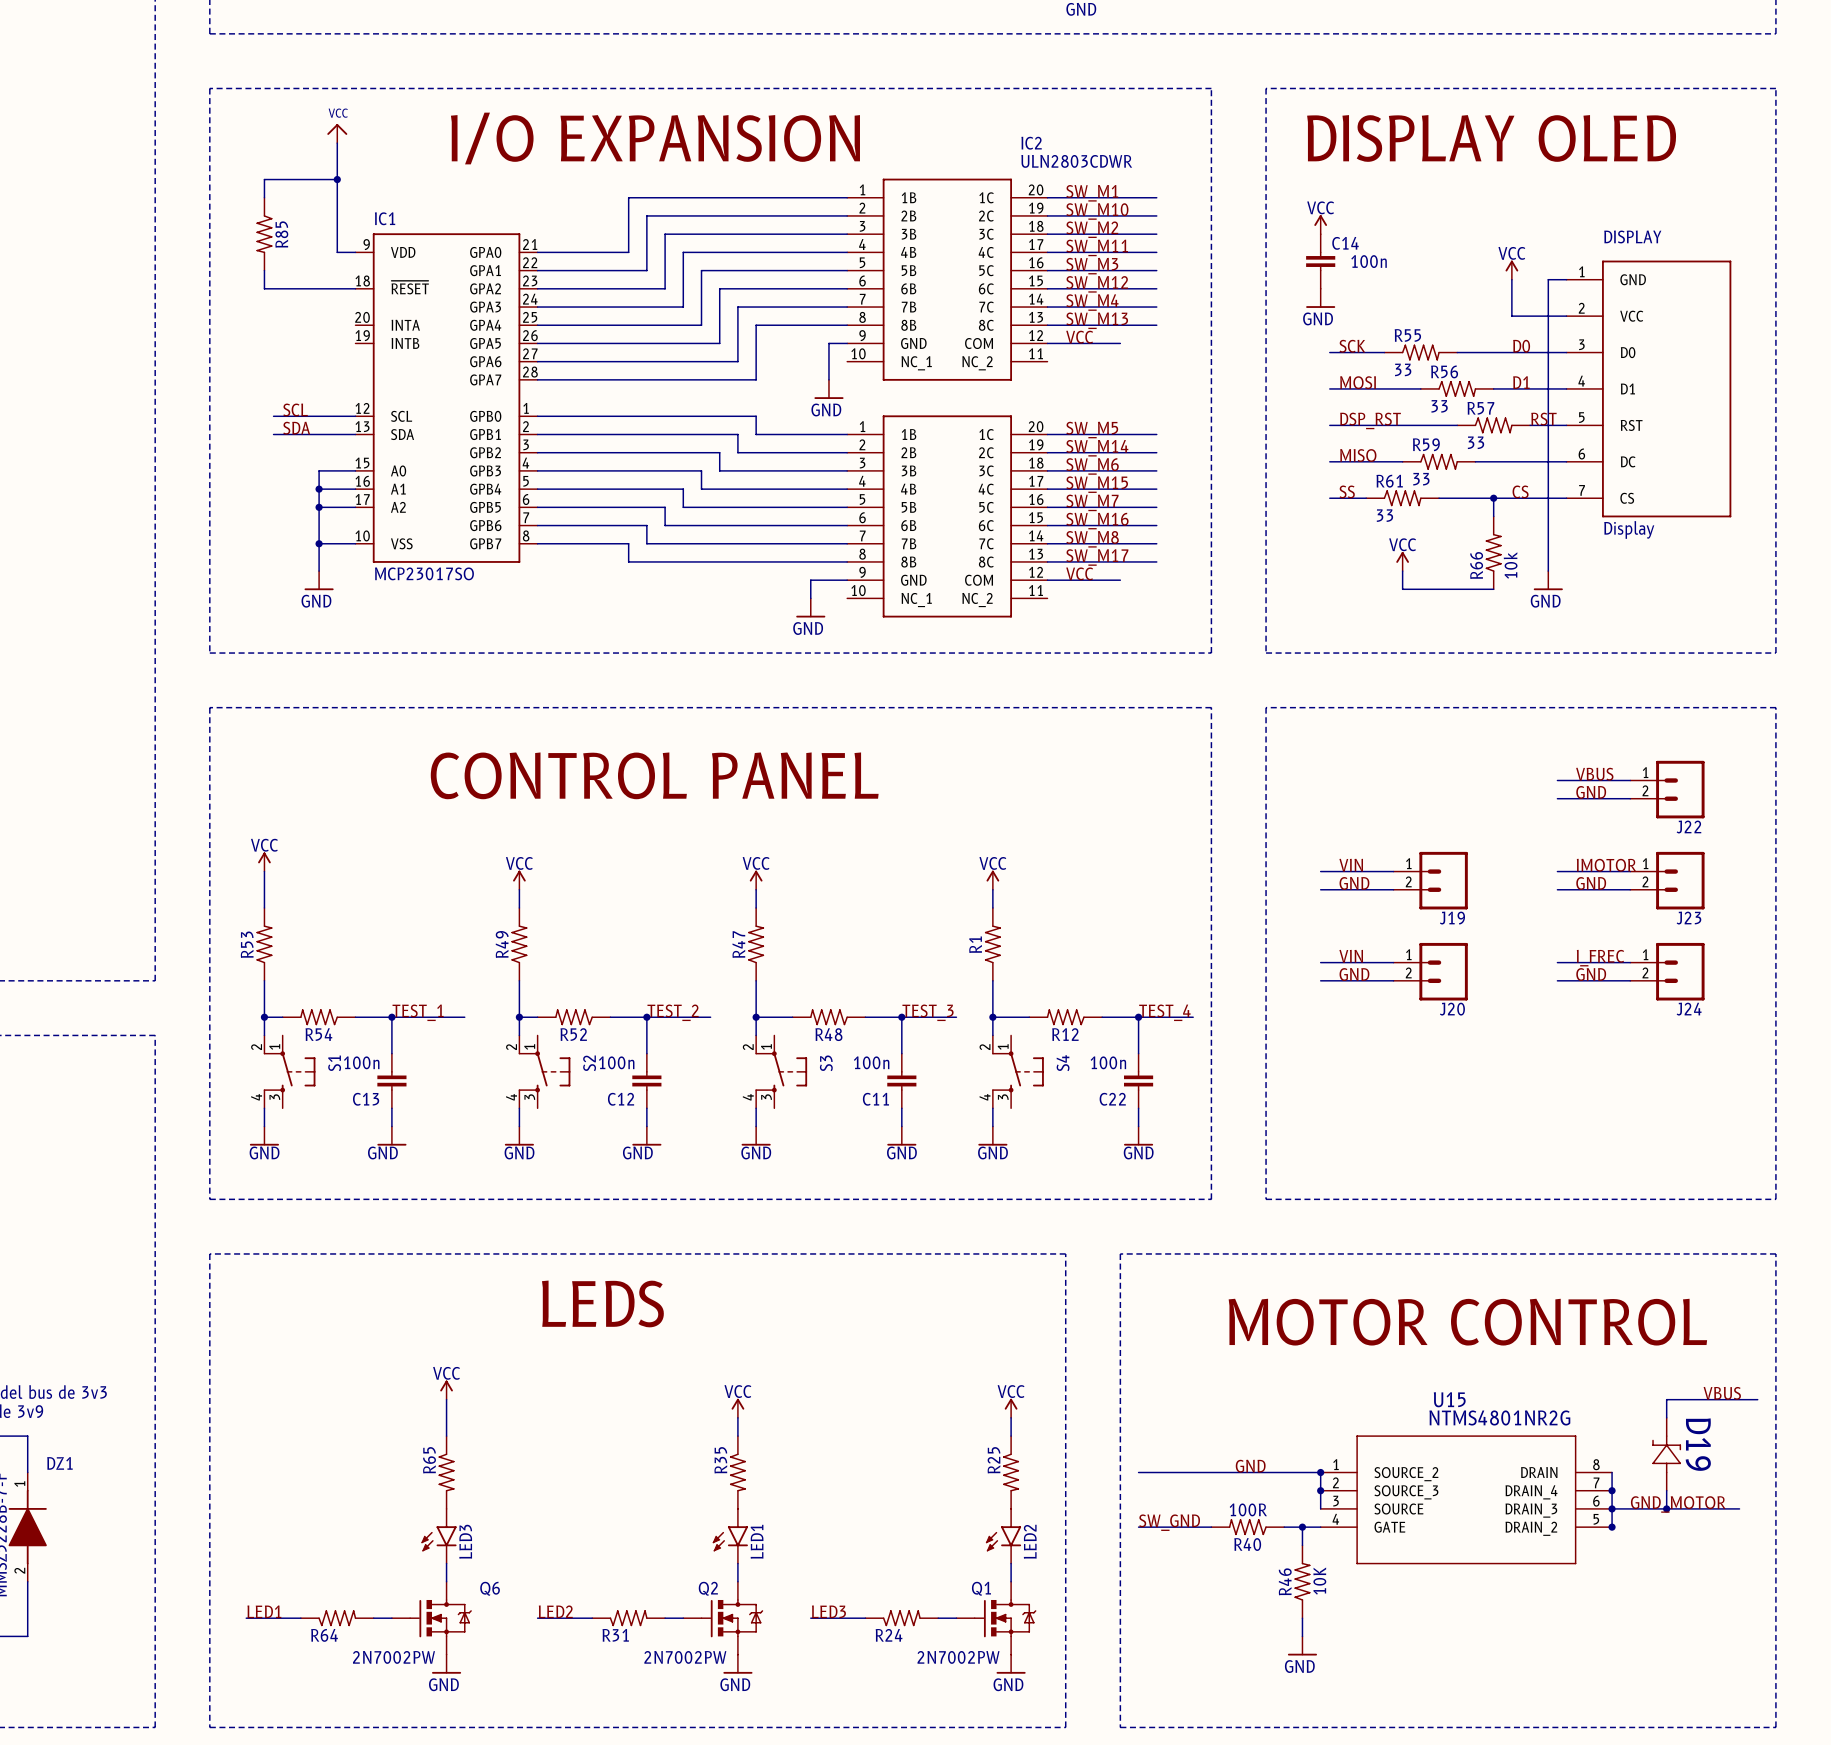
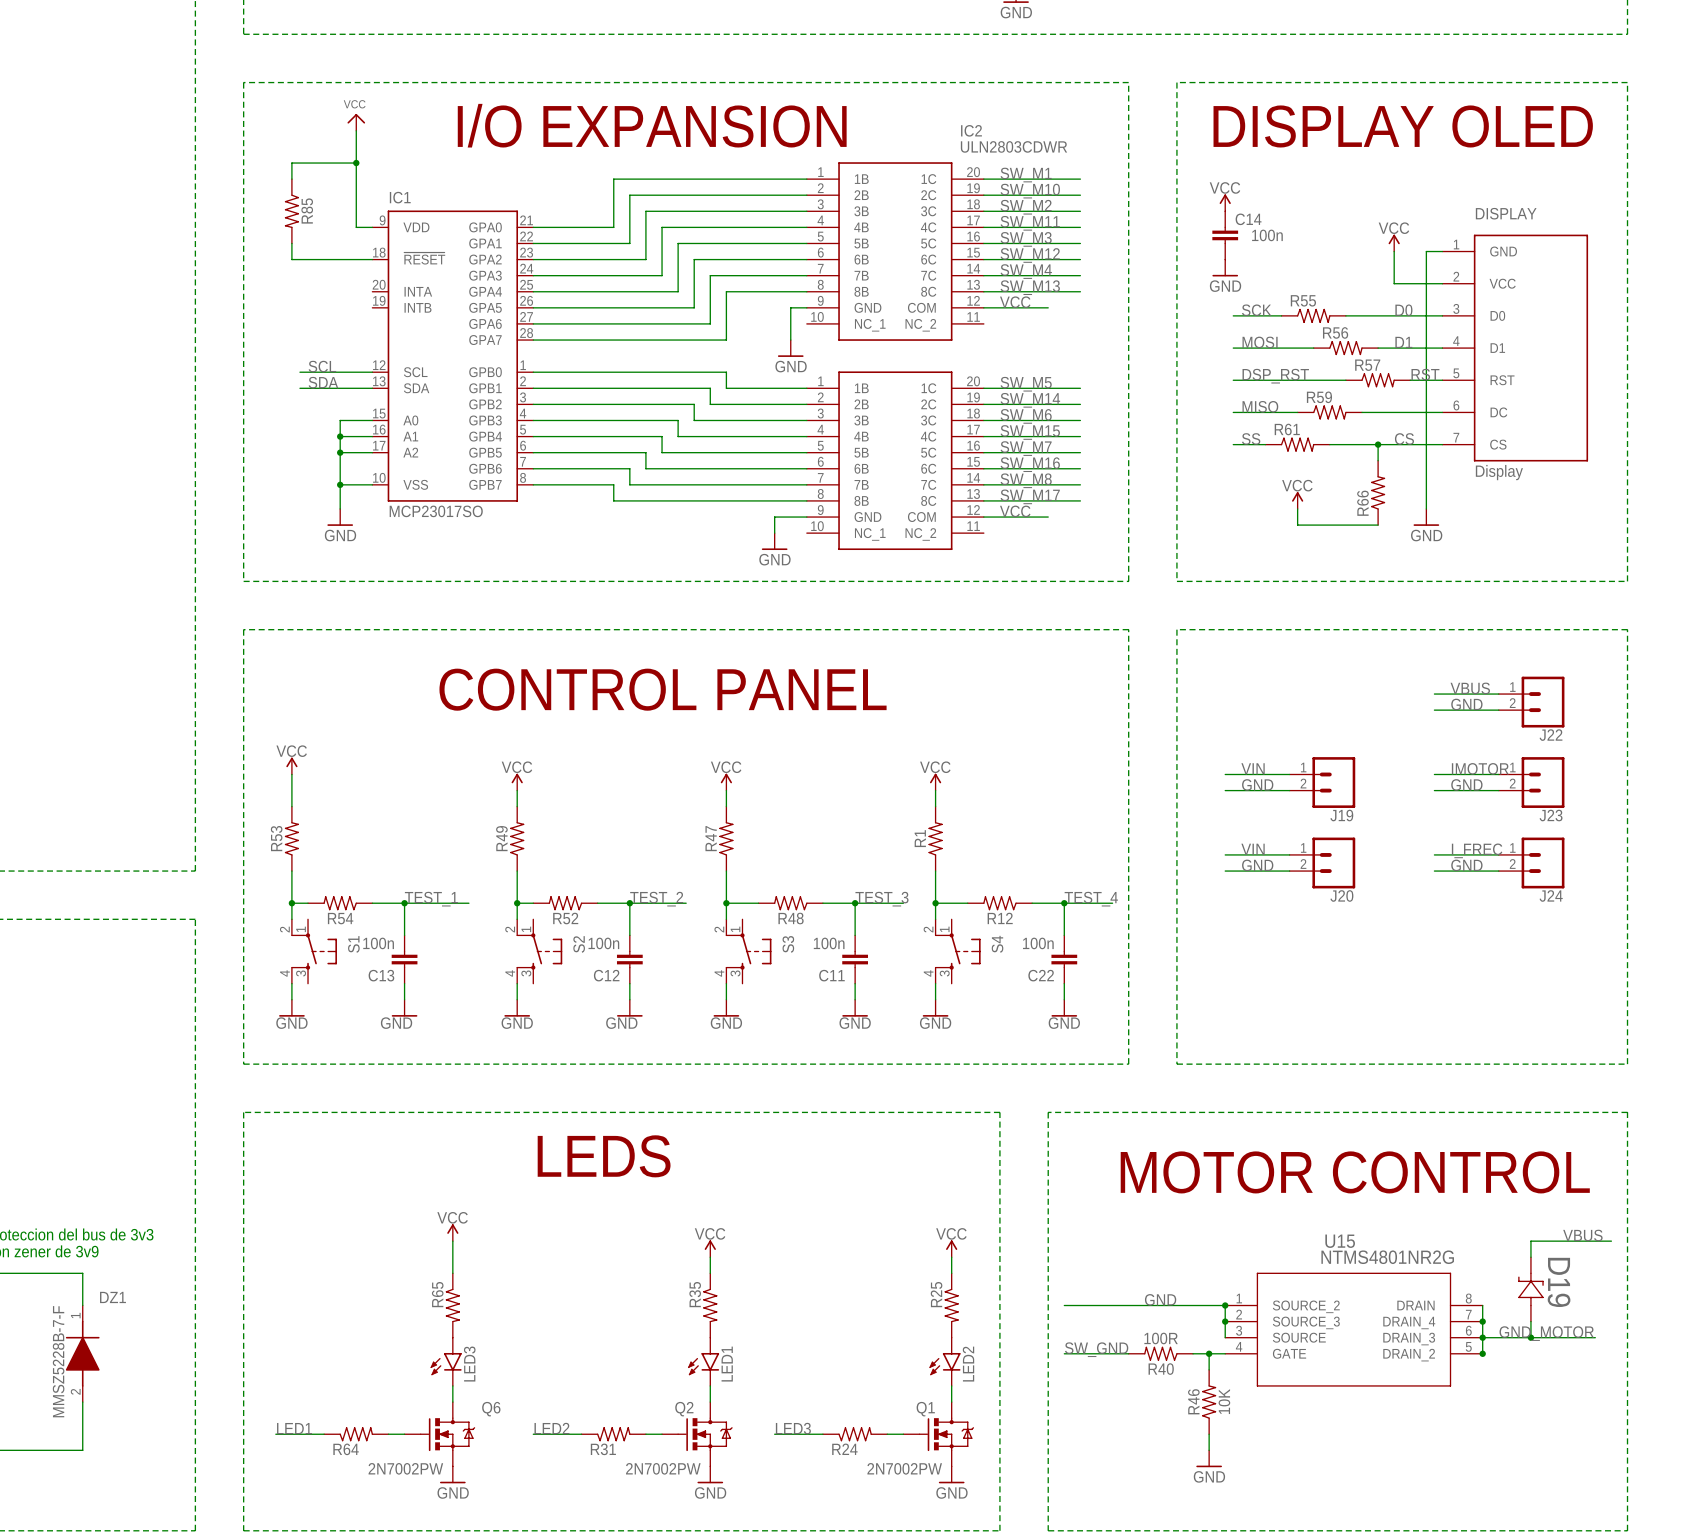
R55 value: 33 (1403, 369) -> none
R56 value: 33 (1439, 406) -> none
R57 value: 33 (1476, 442) -> none
R59 value: 33 (1421, 479) -> none
R61 value: 33 (1384, 515) -> none
R66 value: 10k (1510, 565) -> none

